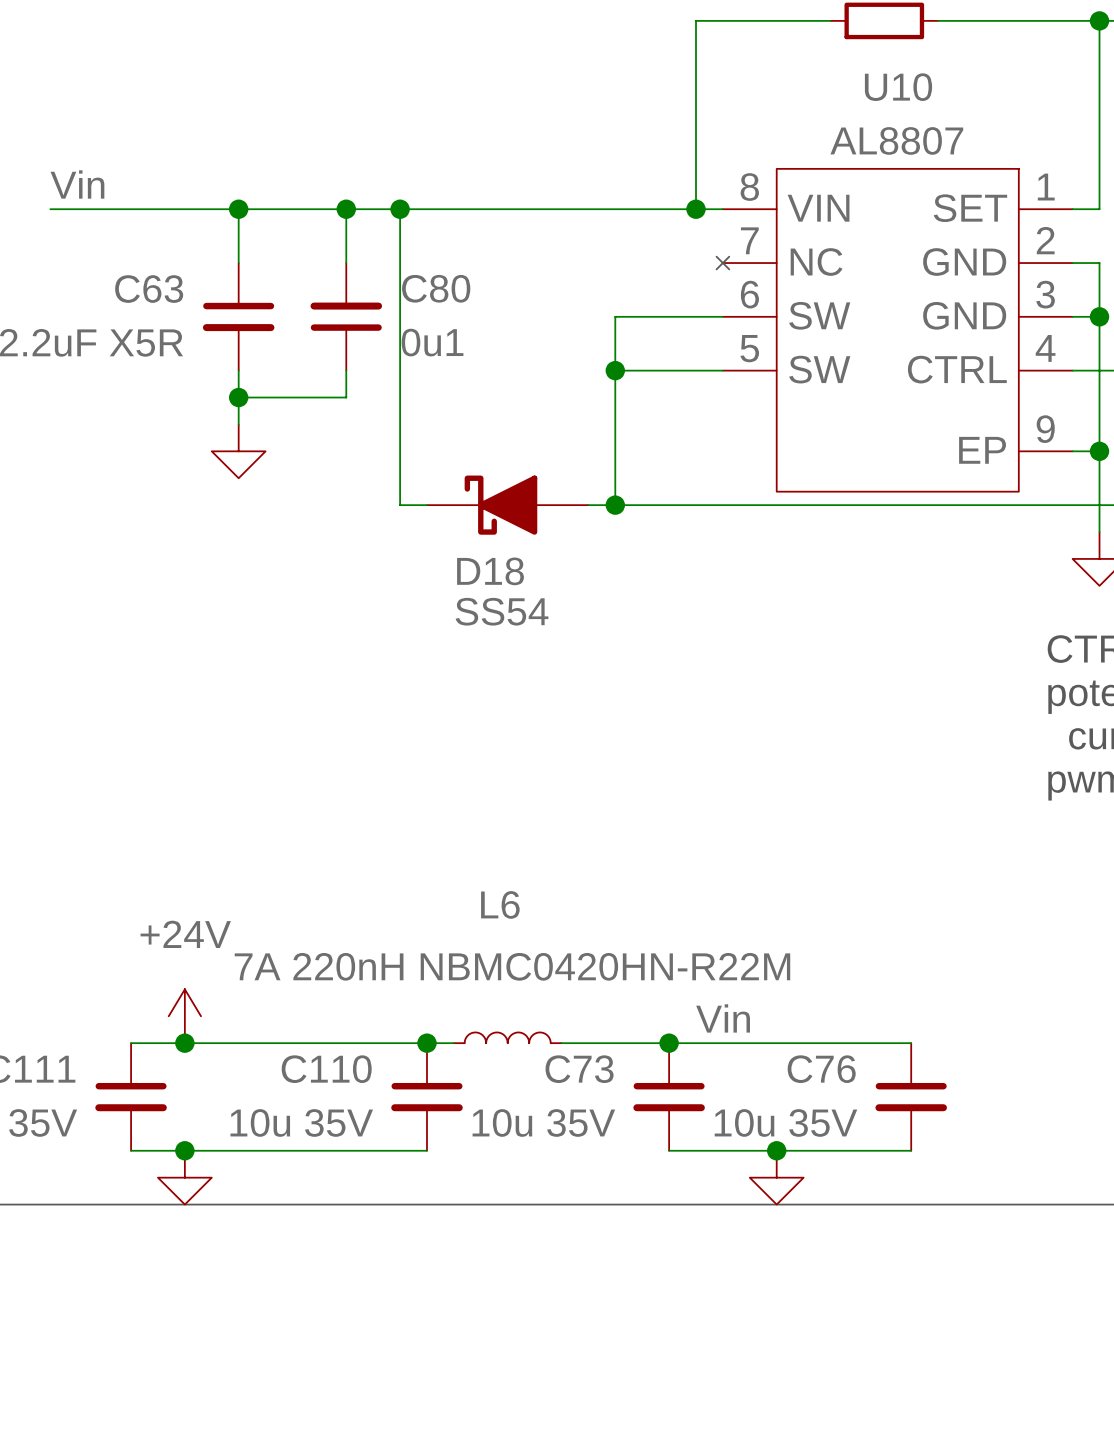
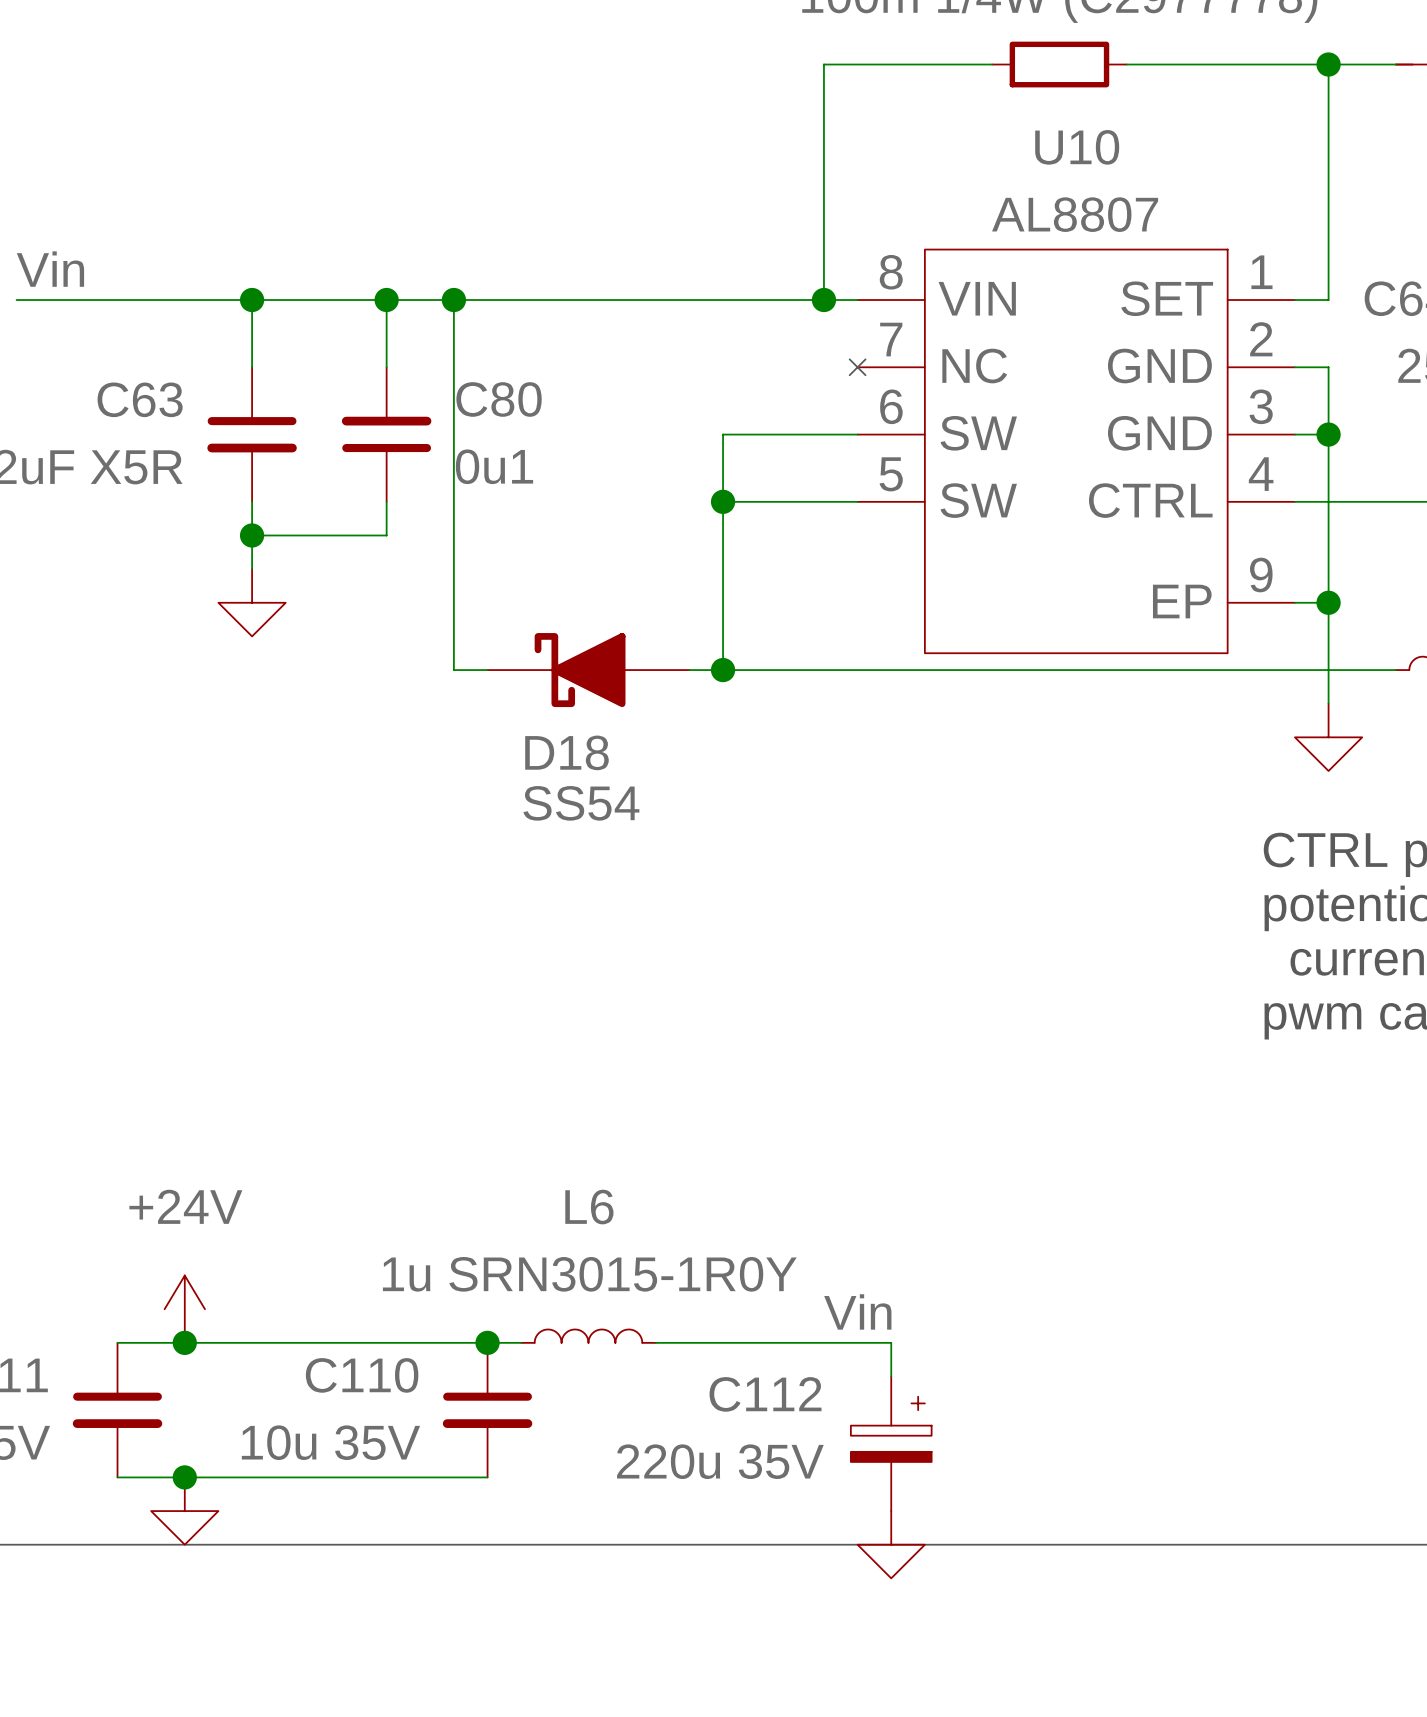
L6 name position: L6 (500, 904) -> L6 (589, 1207)
L6 value: 7A 220nH NBMC0420HN-R22M (512, 966) -> 1u SRN3015-1R0Y (589, 1274)
junction: (669, 1043) -> none
wire: (749, 1043) (911, 1043) -> (891, 1342) (891, 1376)
C73: 10u 35V (669, 1096) -> none
C76: 10u 35V (911, 1096) -> none
C112: none -> 220u 35V (891, 1443)
wire: (669, 1150) (911, 1150) -> none
junction: (776, 1150) -> none
power symbol position: (776, 1177) -> (891, 1544)

